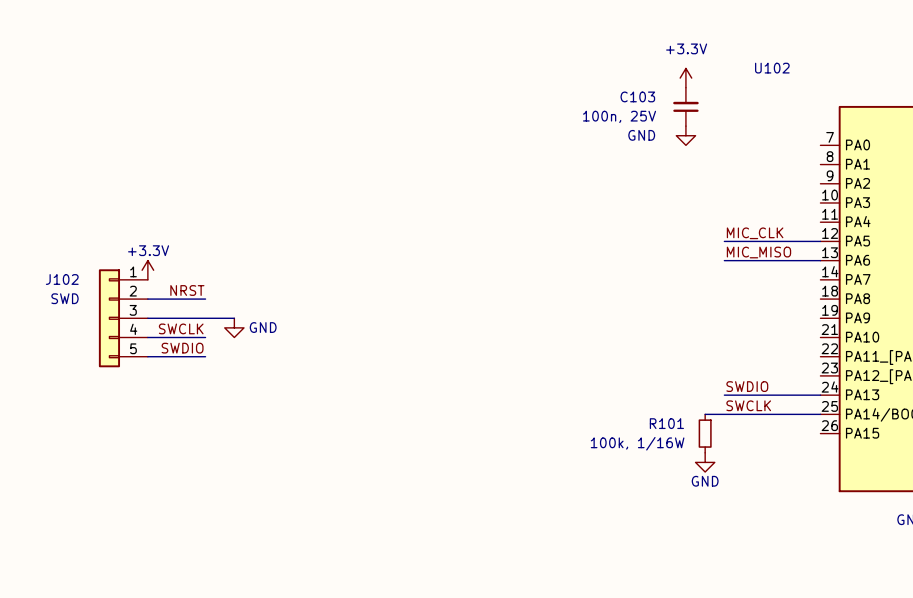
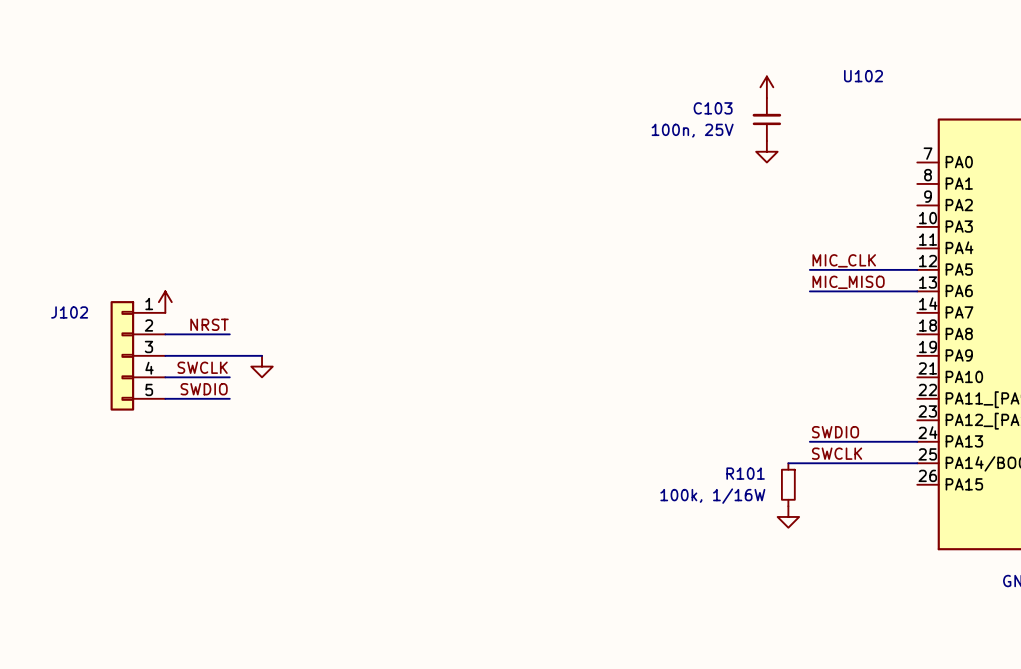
power symbol text: +3.3V (686, 48) -> none
power symbol text: GND (641, 135) -> none
power symbol text: +3.3V (148, 250) -> none
J102 value: SWD (65, 298) -> none
power symbol text: GND (263, 327) -> none
power symbol text: GND (705, 481) -> none

